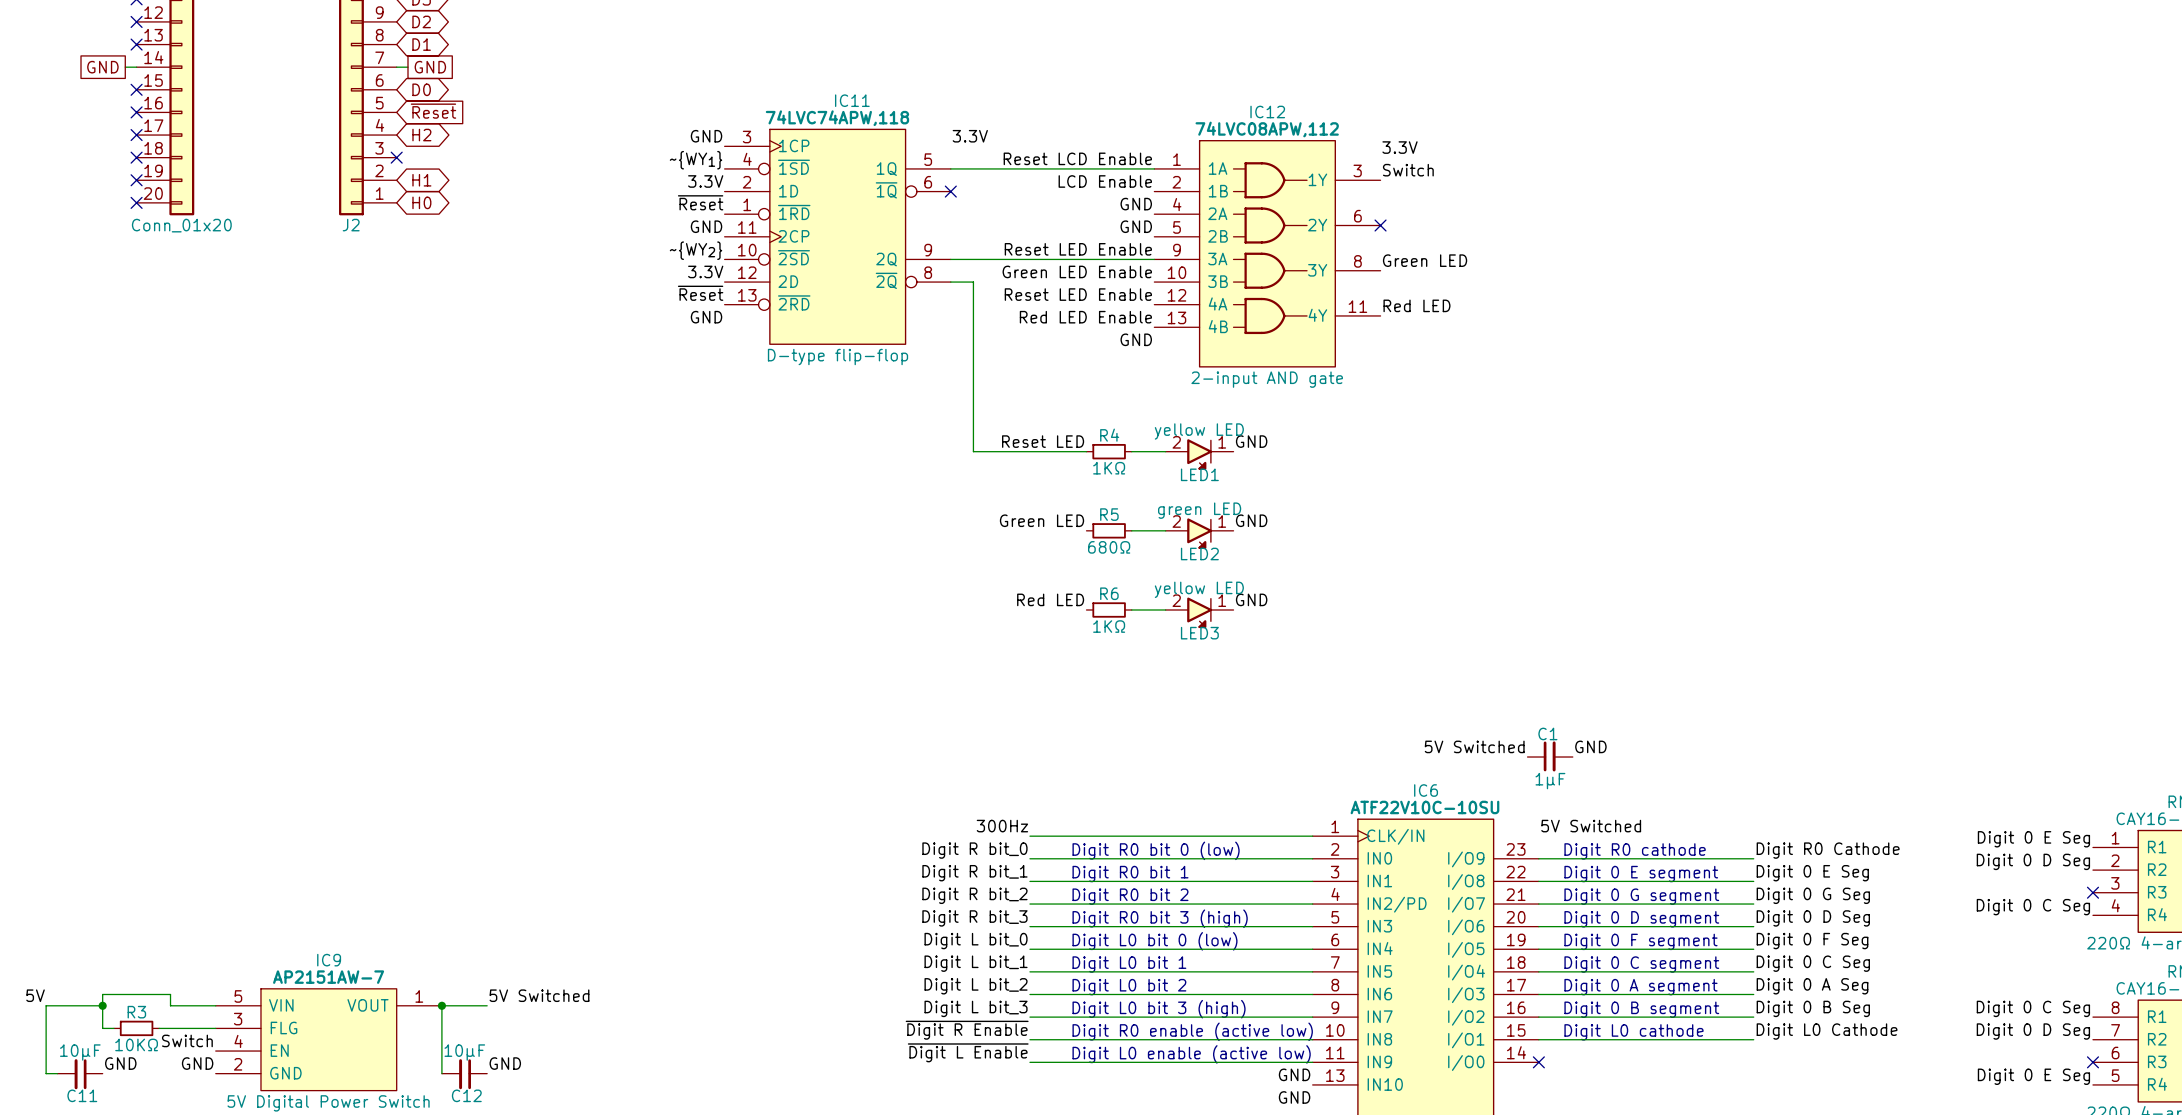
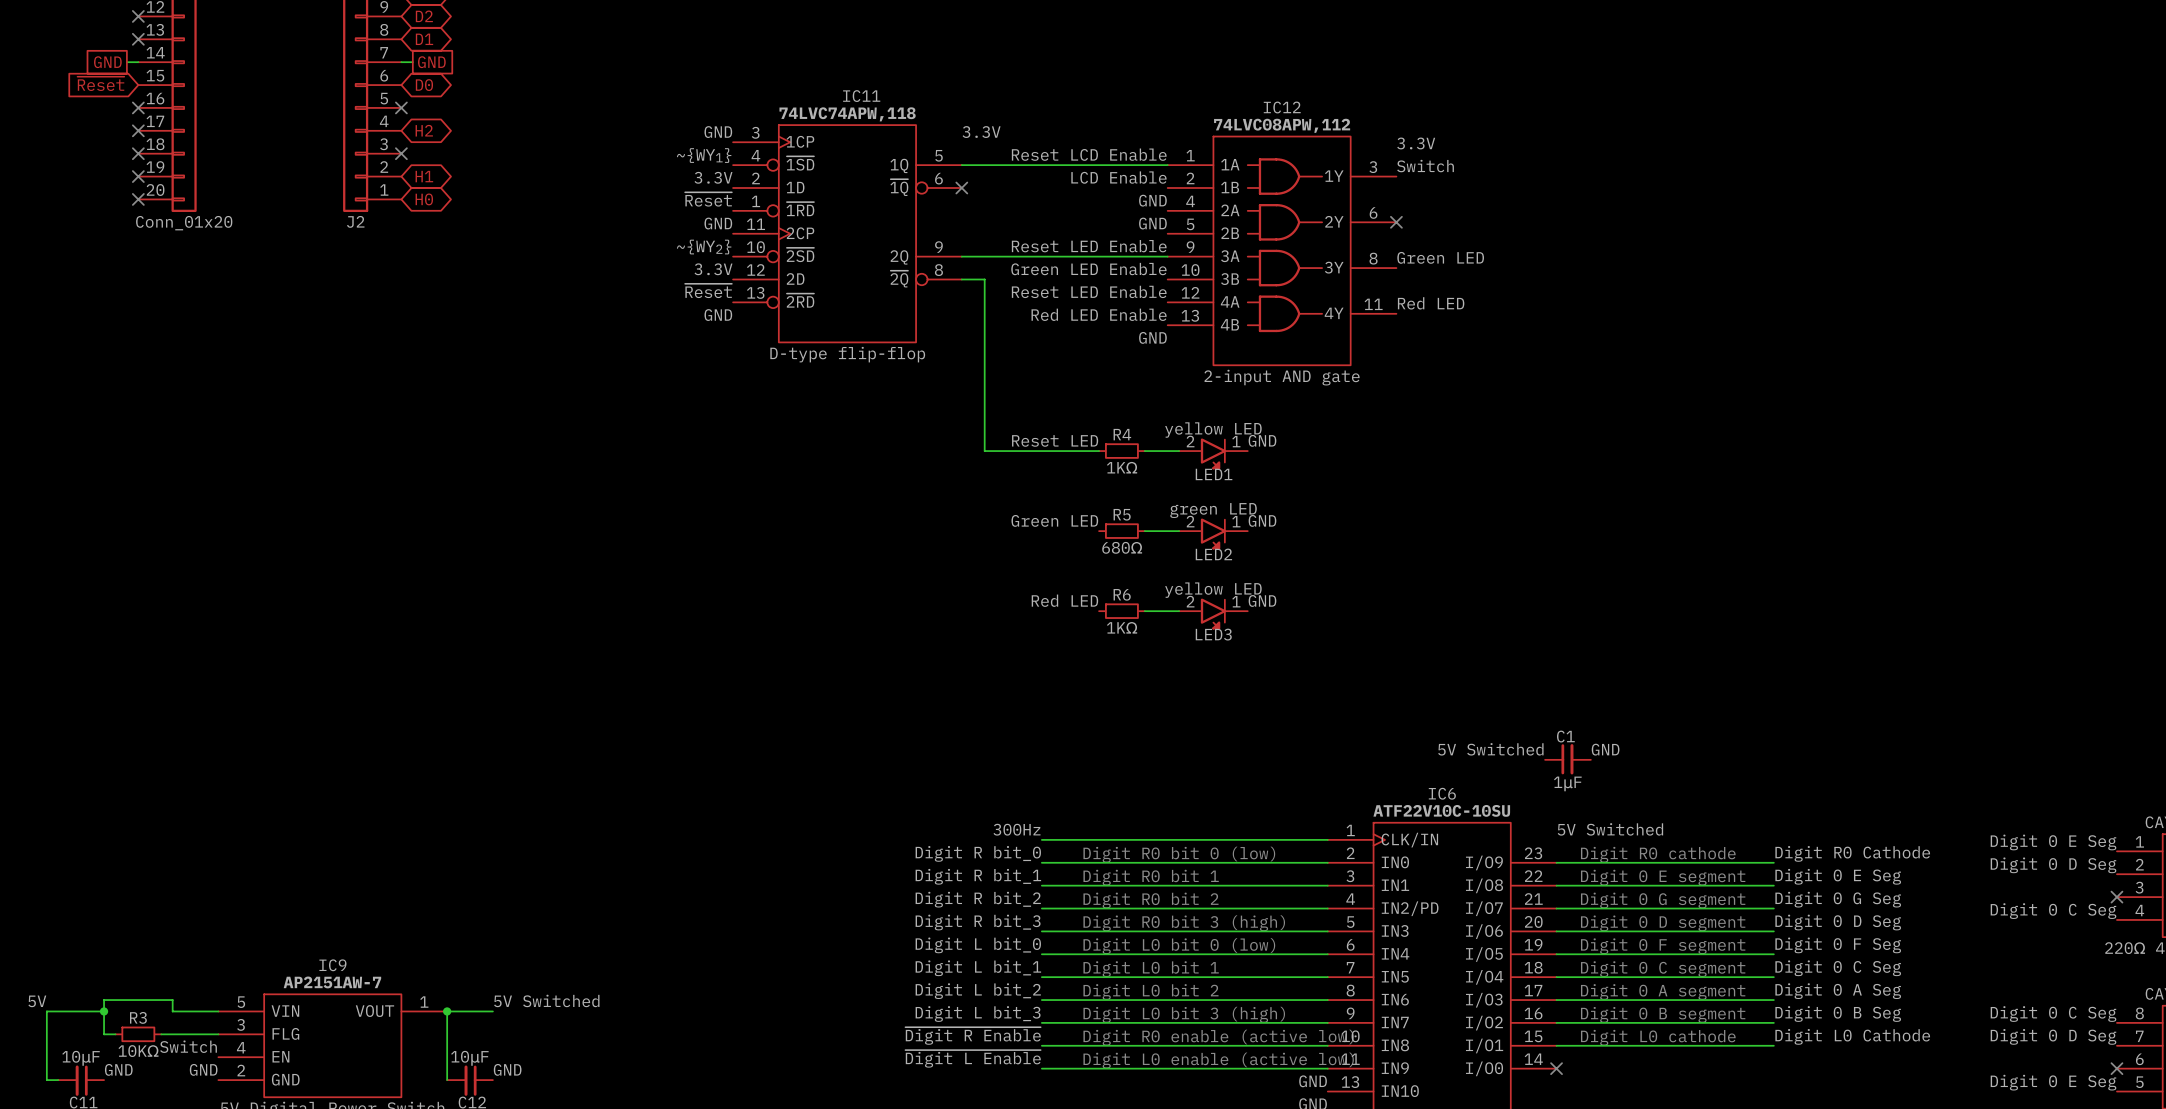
global label: none -> ~{Reset} (100, 83)
no-connect mark: (136, 89) -> none
global label: ~{Reset} (433, 111) -> none
no-connect mark: none -> (401, 107)

